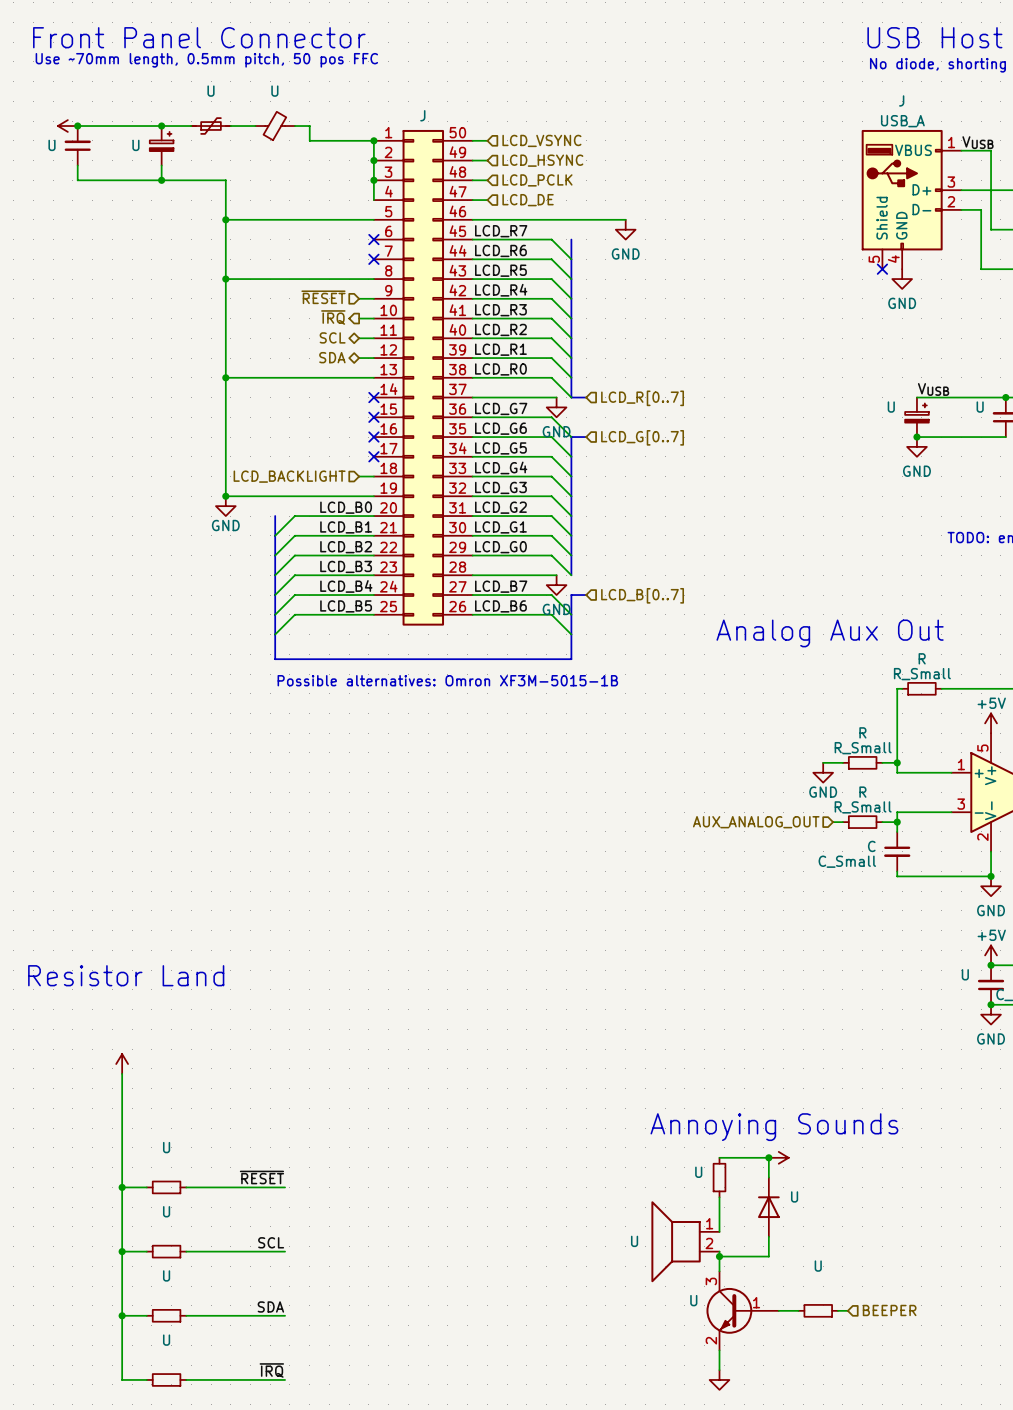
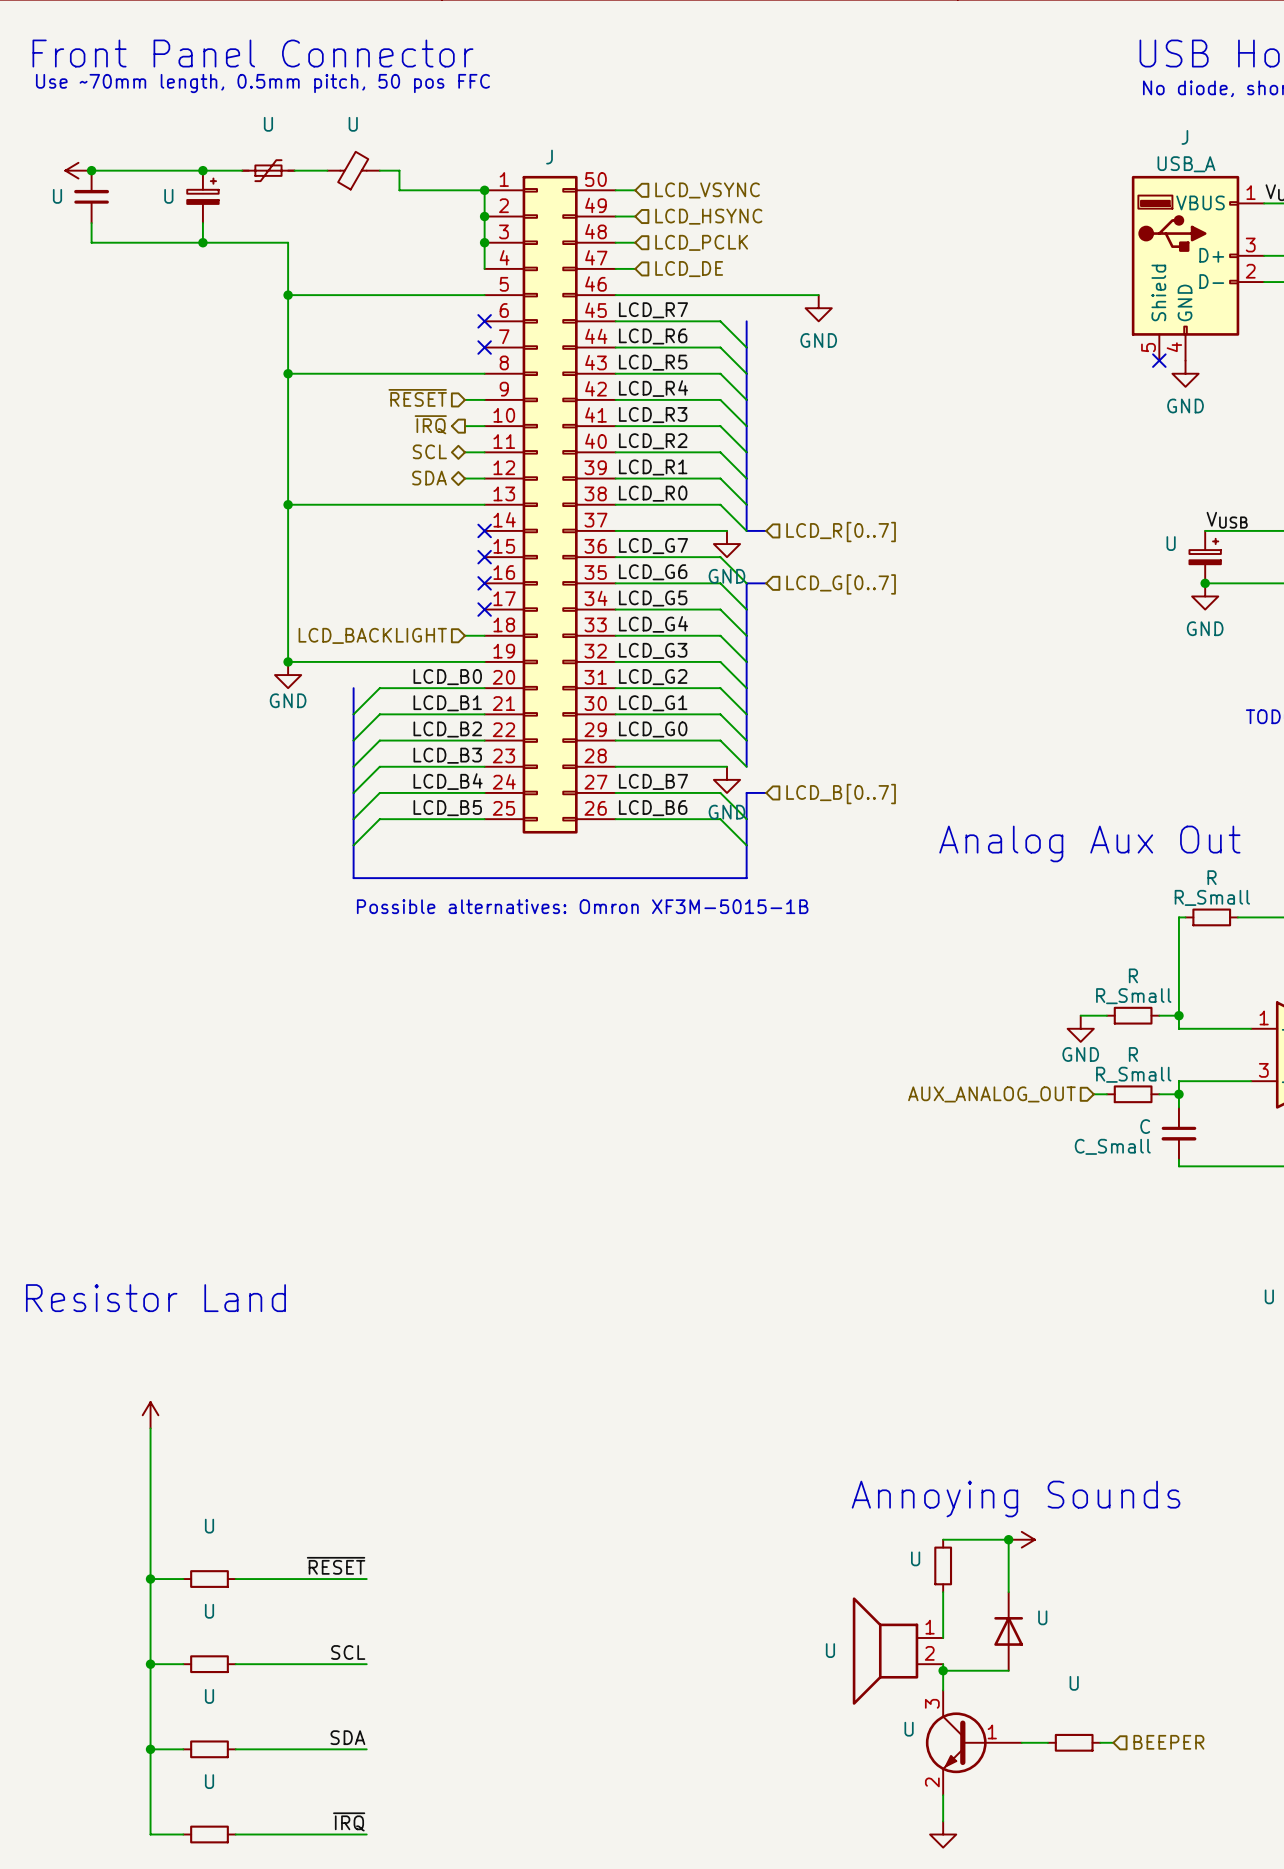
U position: (768, 1207) -> (1008, 1631)

